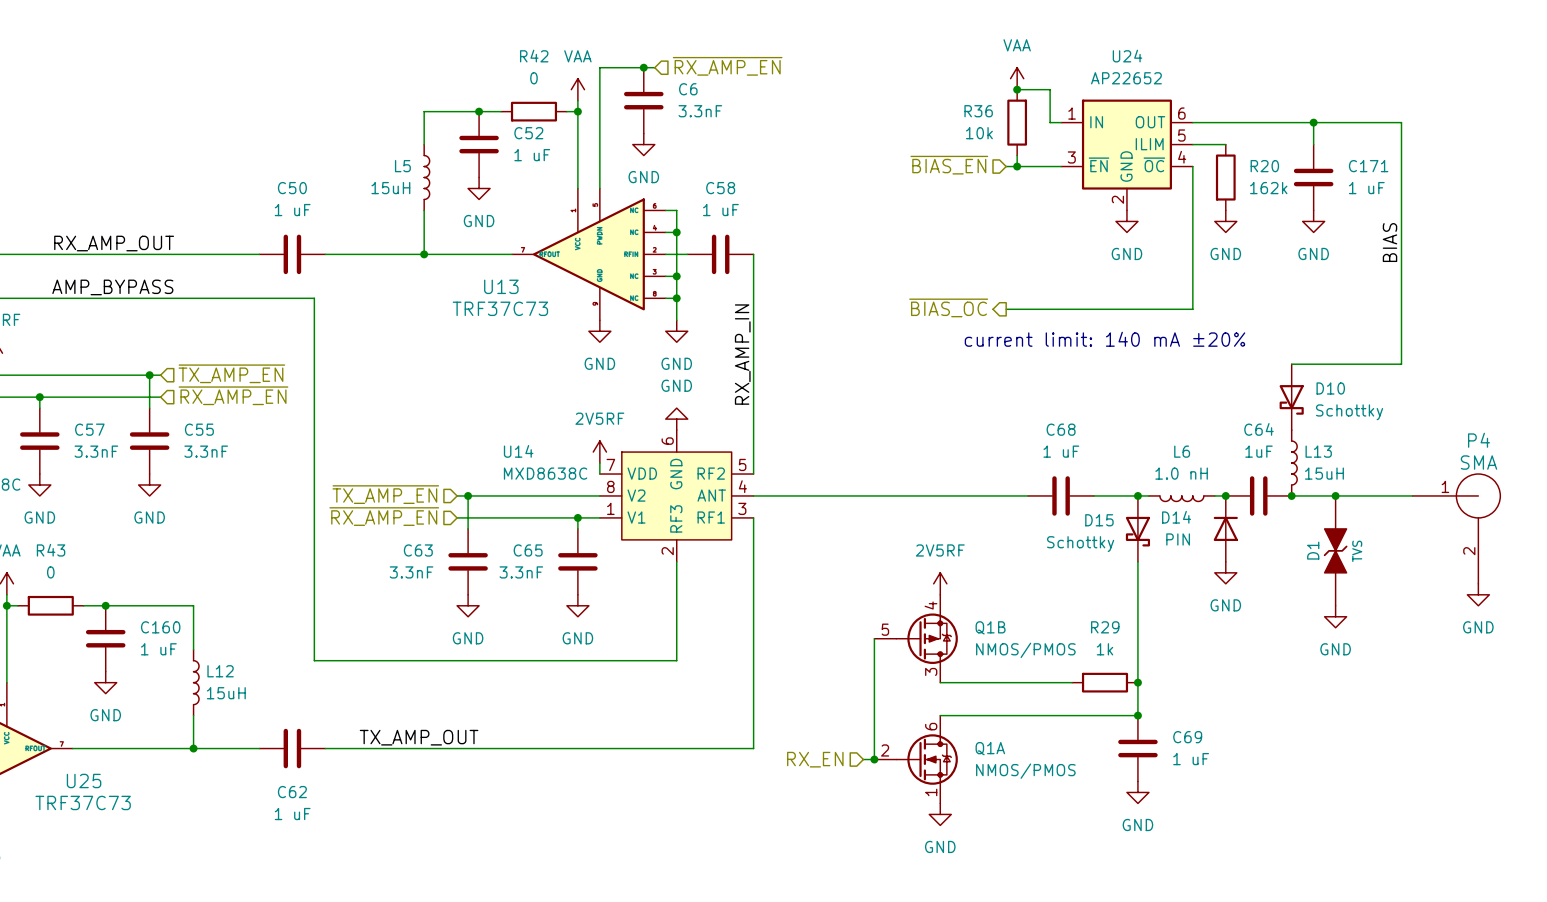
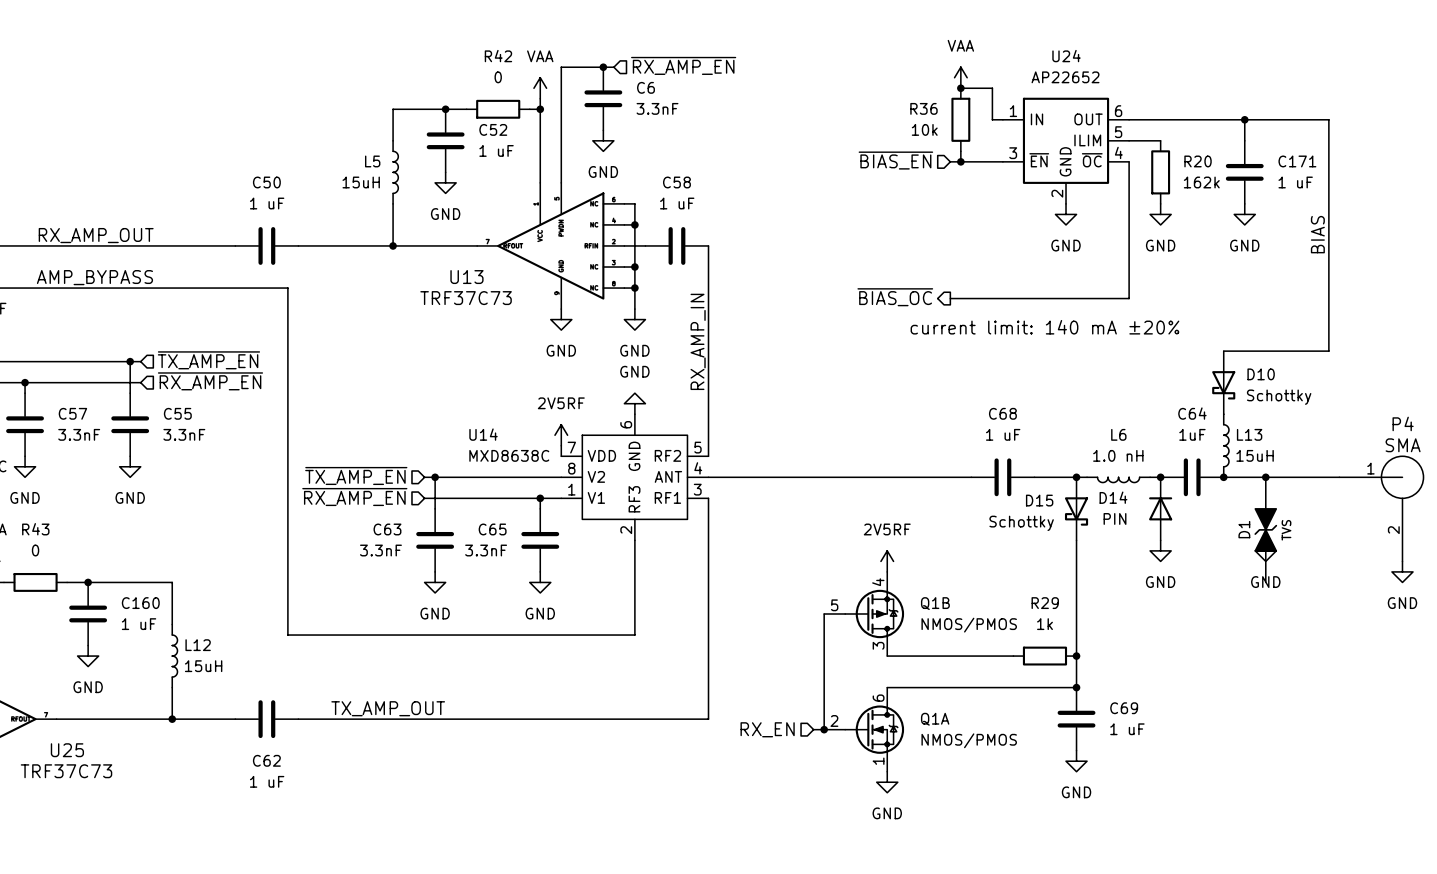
power symbol position: GND (1335, 616) -> GND (1265, 550)

